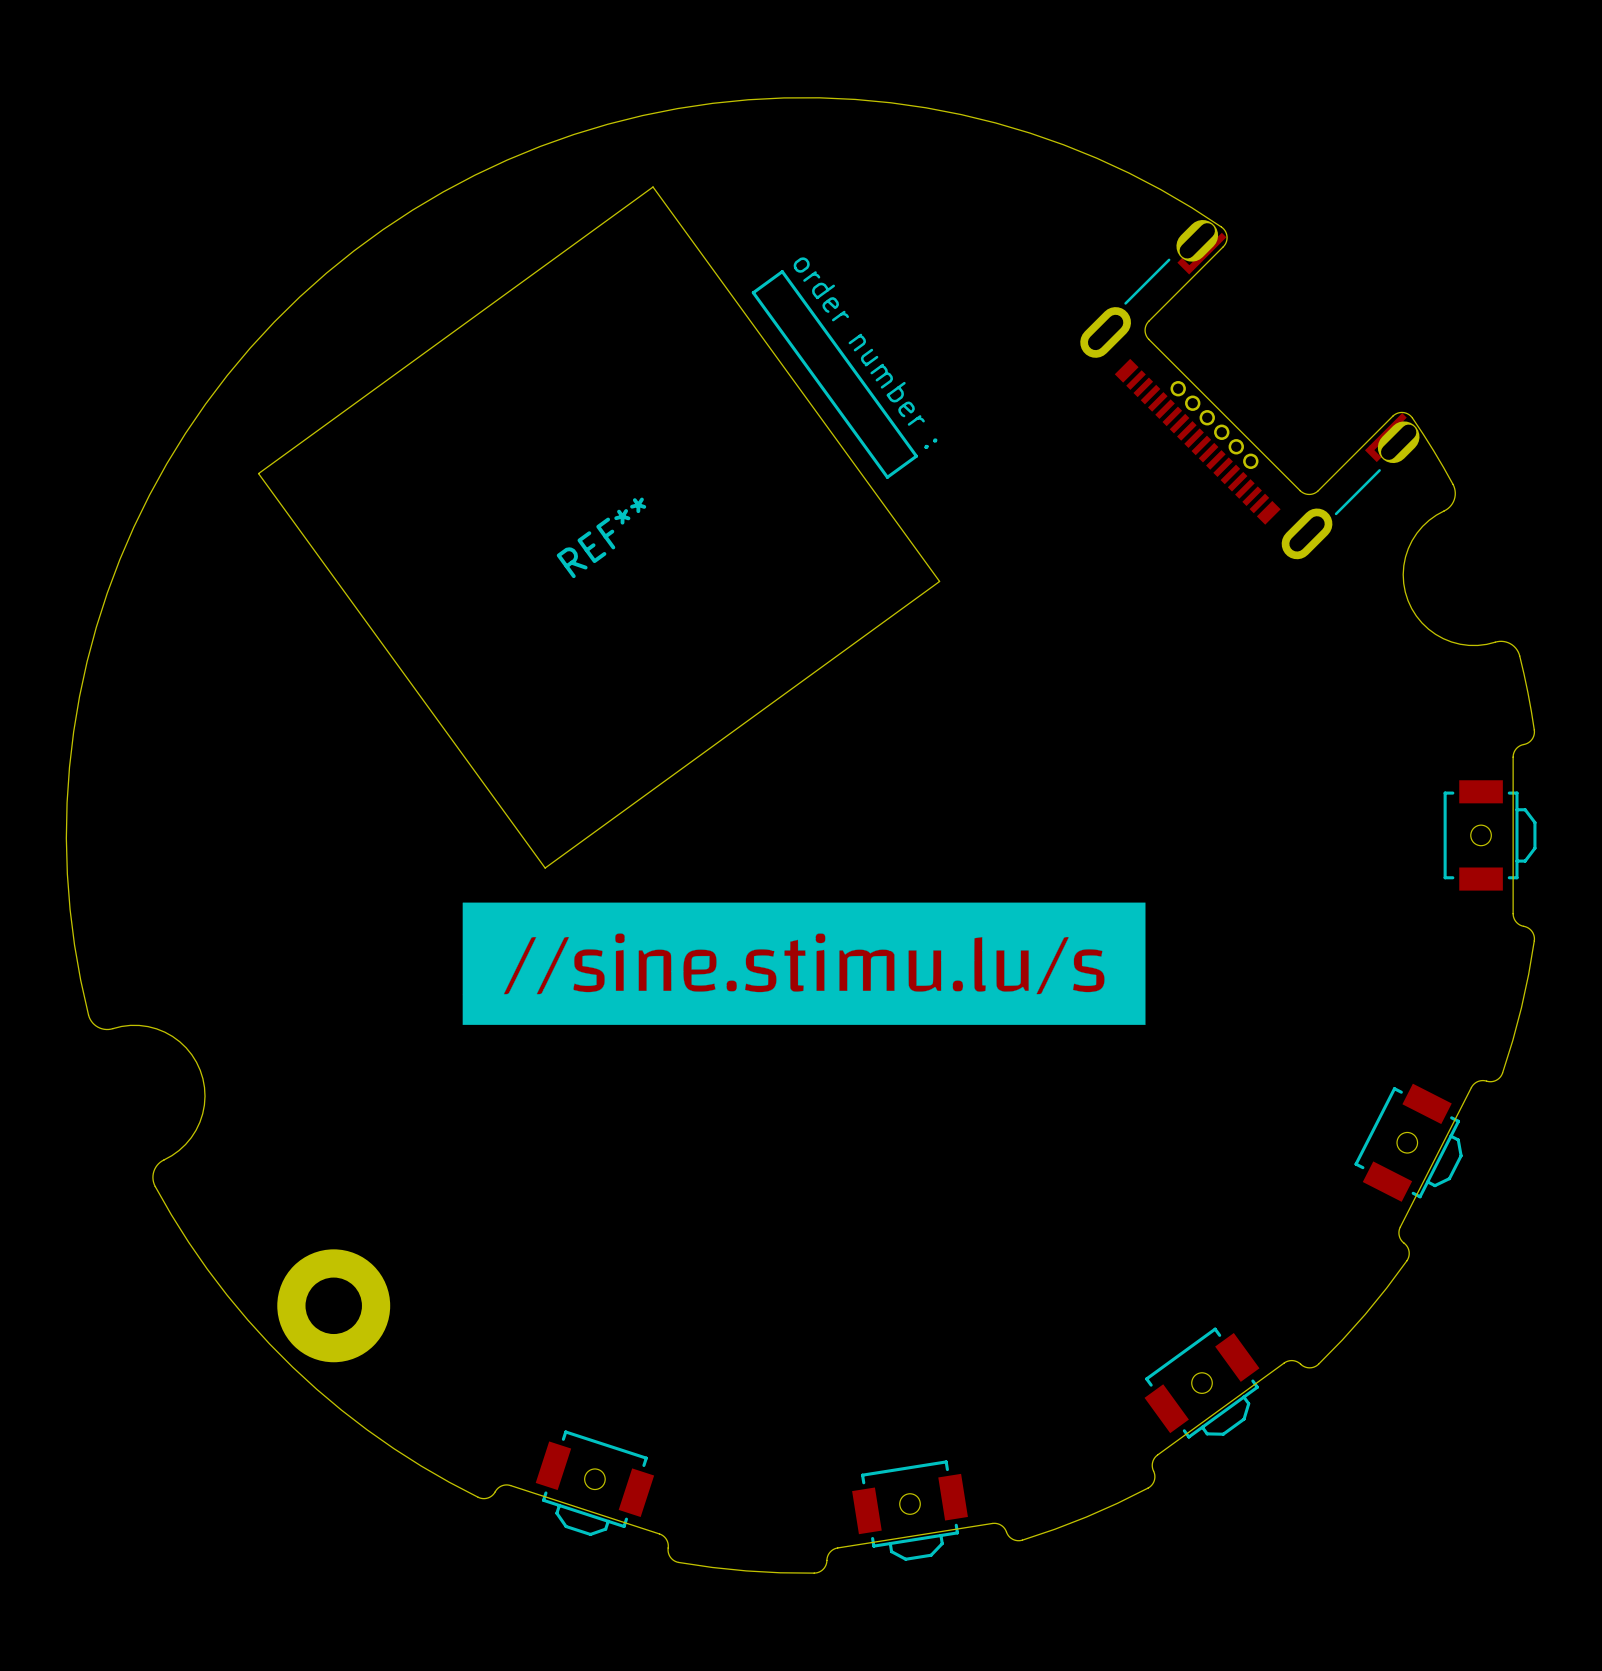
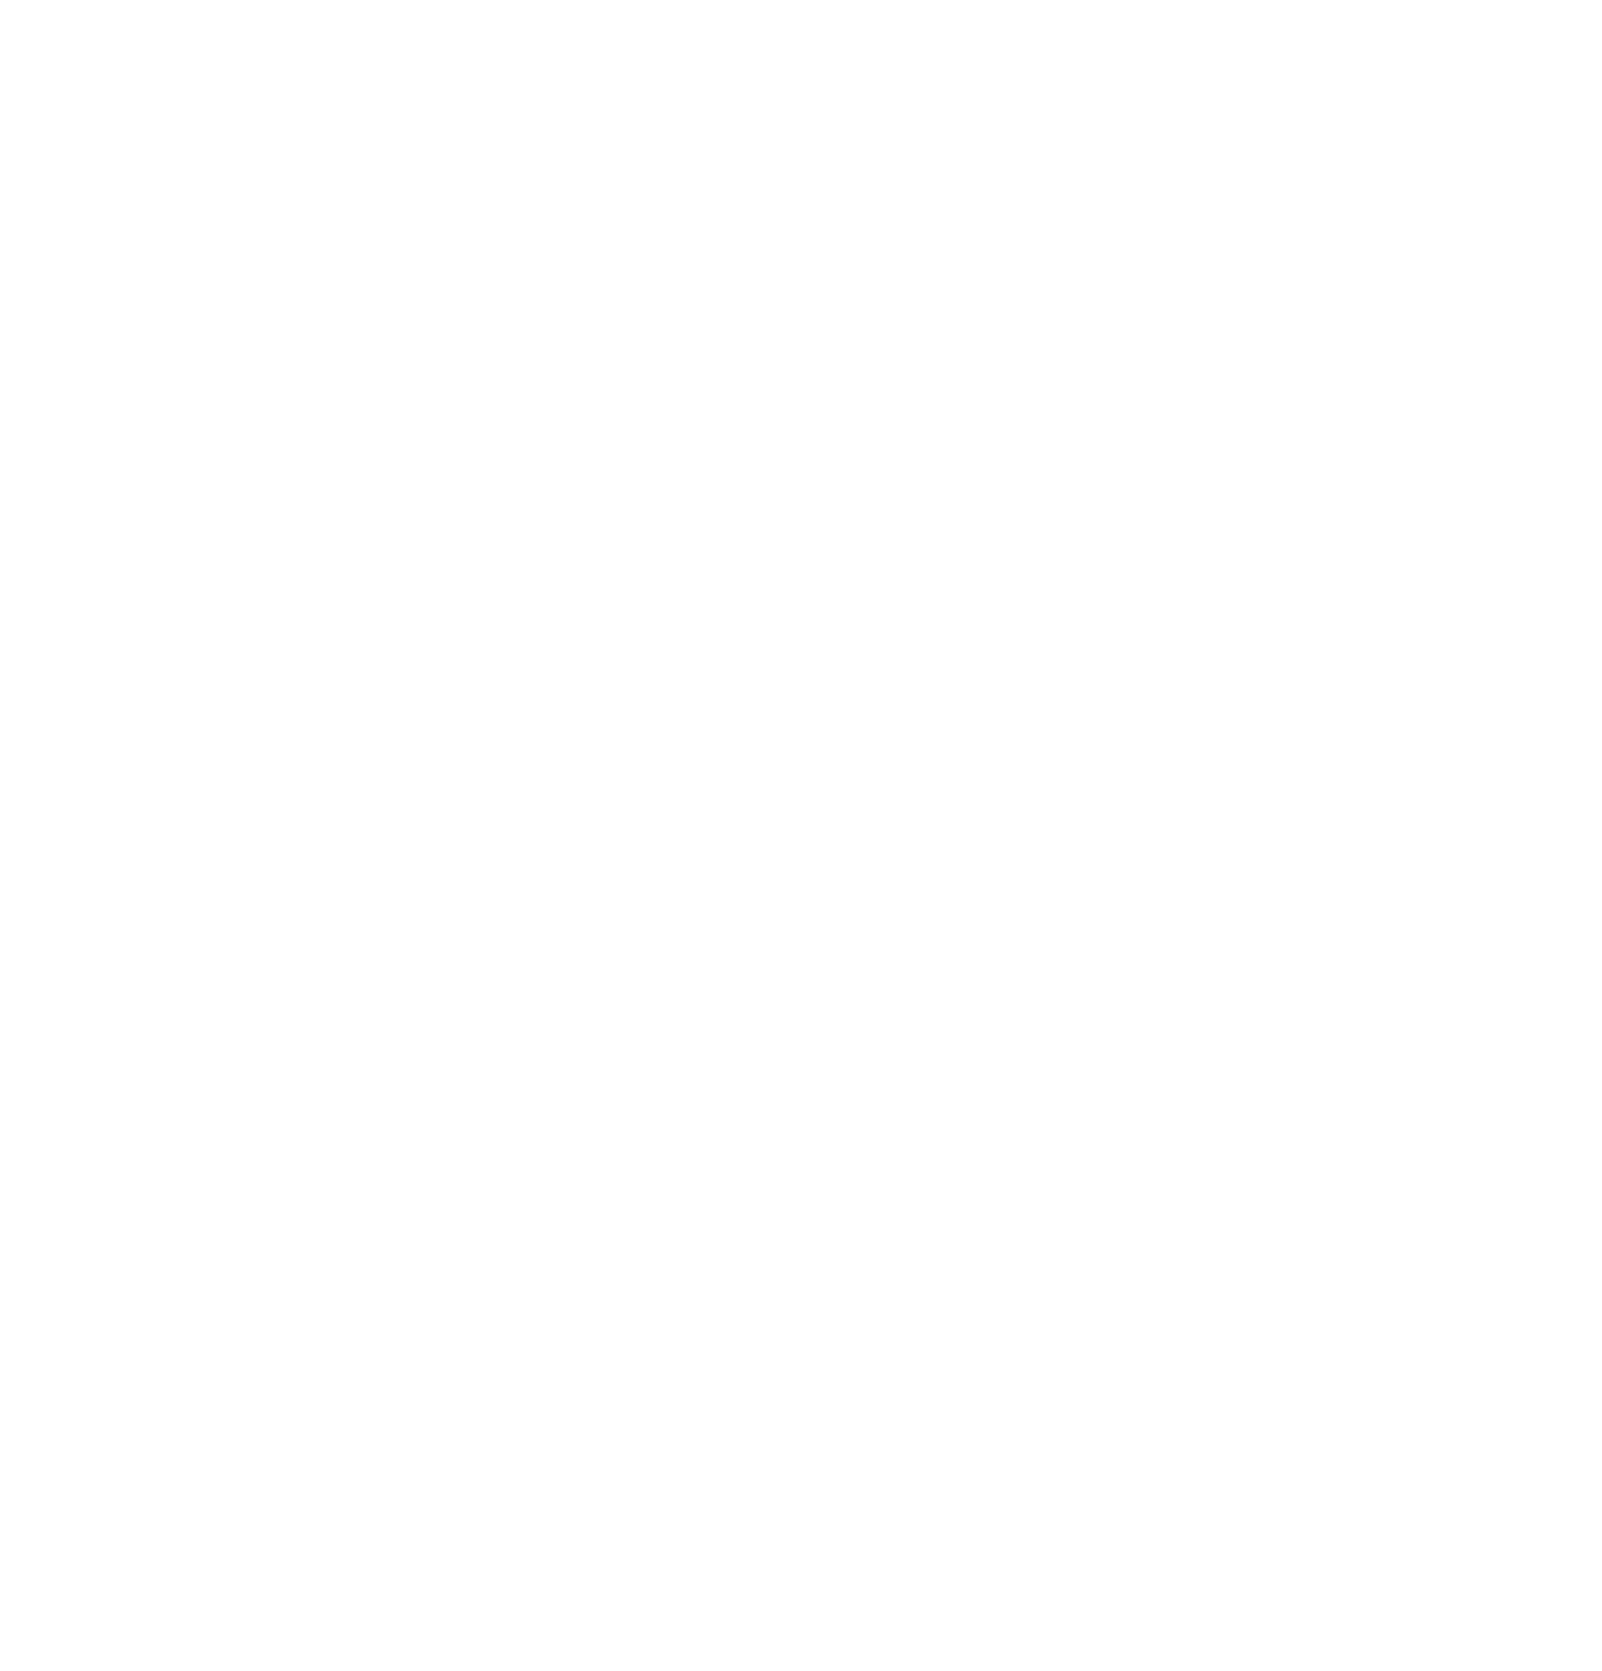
board edge: (653, 187) (258, 473) (545, 868) (939, 581) (653, 187) -> none
board edge: (1221, 227) (1160, 189) (1096, 158) (1030, 133) (961, 114) (890, 102) (819, 97) (748, 99) (677, 108) (607, 124) (540, 146) (474, 175) (443, 191) (382, 229) (326, 273) (274, 321) (227, 375) (185, 433) (149, 495) (119, 559) (96, 627) (79, 696) (69, 767) (66, 838) (70, 909) (80, 980) (89, 1017) (95, 1025) (106, 1029) (139, 1025) (164, 1032) (186, 1047) (200, 1070) (205, 1096) (199, 1122) (185, 1144) (158, 1163) (152, 1175) (155, 1186) (188, 1242) (226, 1294) (292, 1367) (341, 1410) (393, 1448) (449, 1482) (479, 1497) (489, 1497) (500, 1486) (510, 1485) (660, 1534) (667, 1540) (668, 1554) (674, 1560) (712, 1567) (780, 1572) (815, 1572) (824, 1568) (829, 1553) (836, 1548) (993, 1523) (1002, 1526) (1011, 1538) (1020, 1540) (1086, 1517) (1149, 1487) (1154, 1479) (1152, 1463) (1157, 1455) (1285, 1362) (1294, 1360) (1309, 1367) (1318, 1364) (1365, 1314) (1406, 1260) (1409, 1251) (1399, 1237) (1400, 1227) (1472, 1086) (1479, 1081) (1494, 1080) (1501, 1074) (1521, 1007) (1534, 939) (1530, 930) (1517, 923) (1513, 915) (1513, 757) (1517, 747) (1528, 742) (1533, 736) (1531, 711) (1519, 655) (1514, 646) (1501, 641) (1468, 645) (1443, 638) (1422, 622) (1408, 600) (1403, 574) (1408, 548) (1422, 526) (1451, 505) (1455, 492) (1453, 486) (1443, 467) (1410, 415) (1401, 412) (1394, 415) (1318, 490) (1312, 494) (1305, 494) (1300, 490) (1146, 336) (1145, 328) (1147, 322) (1224, 245) (1226, 234) (1221, 227) -> none
drawing: [751, 270, 918, 479] -> none
part: (1249, 389) -> none
REF**: (601, 537) -> none
part: (1490, 835) -> none
drawing: [462, 902, 1146, 1025] -> none
part: (1408, 1142) -> none
part: (333, 1305) -> none
part: (1202, 1383) -> none
part: (594, 1483) -> none
part: (910, 1510) -> none

